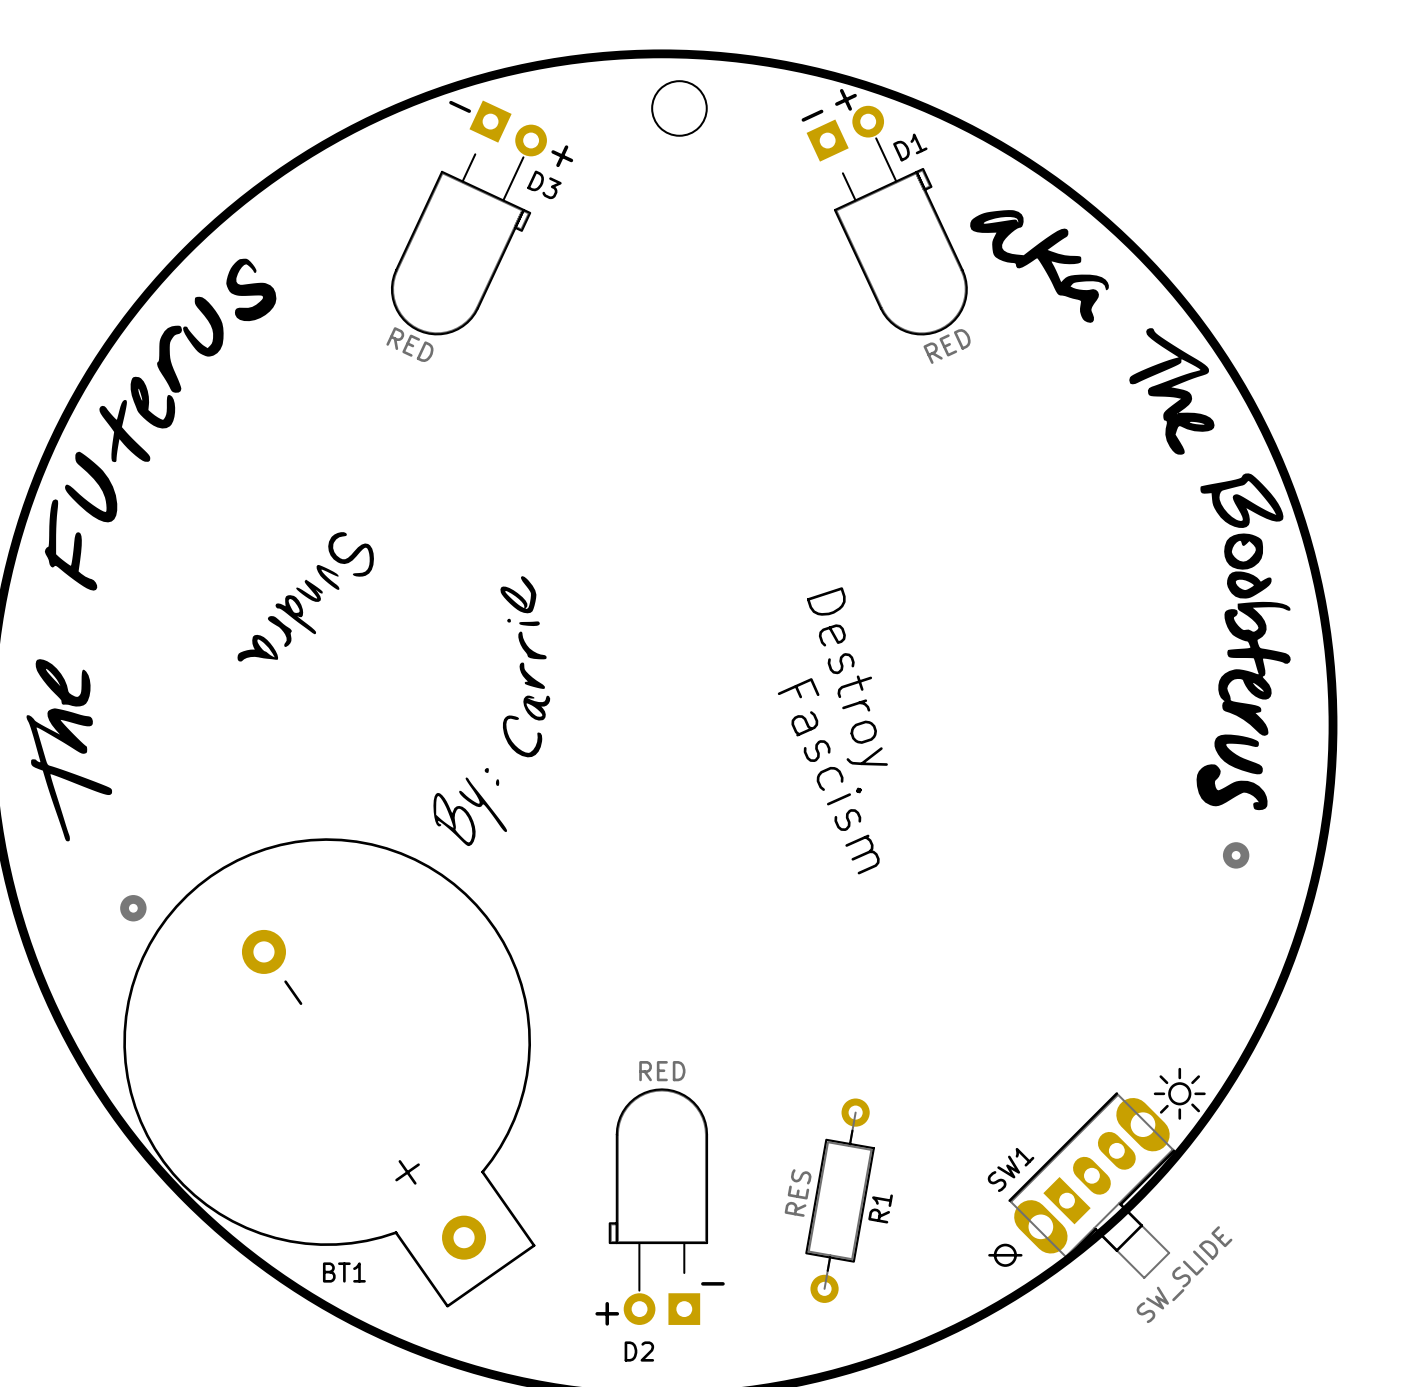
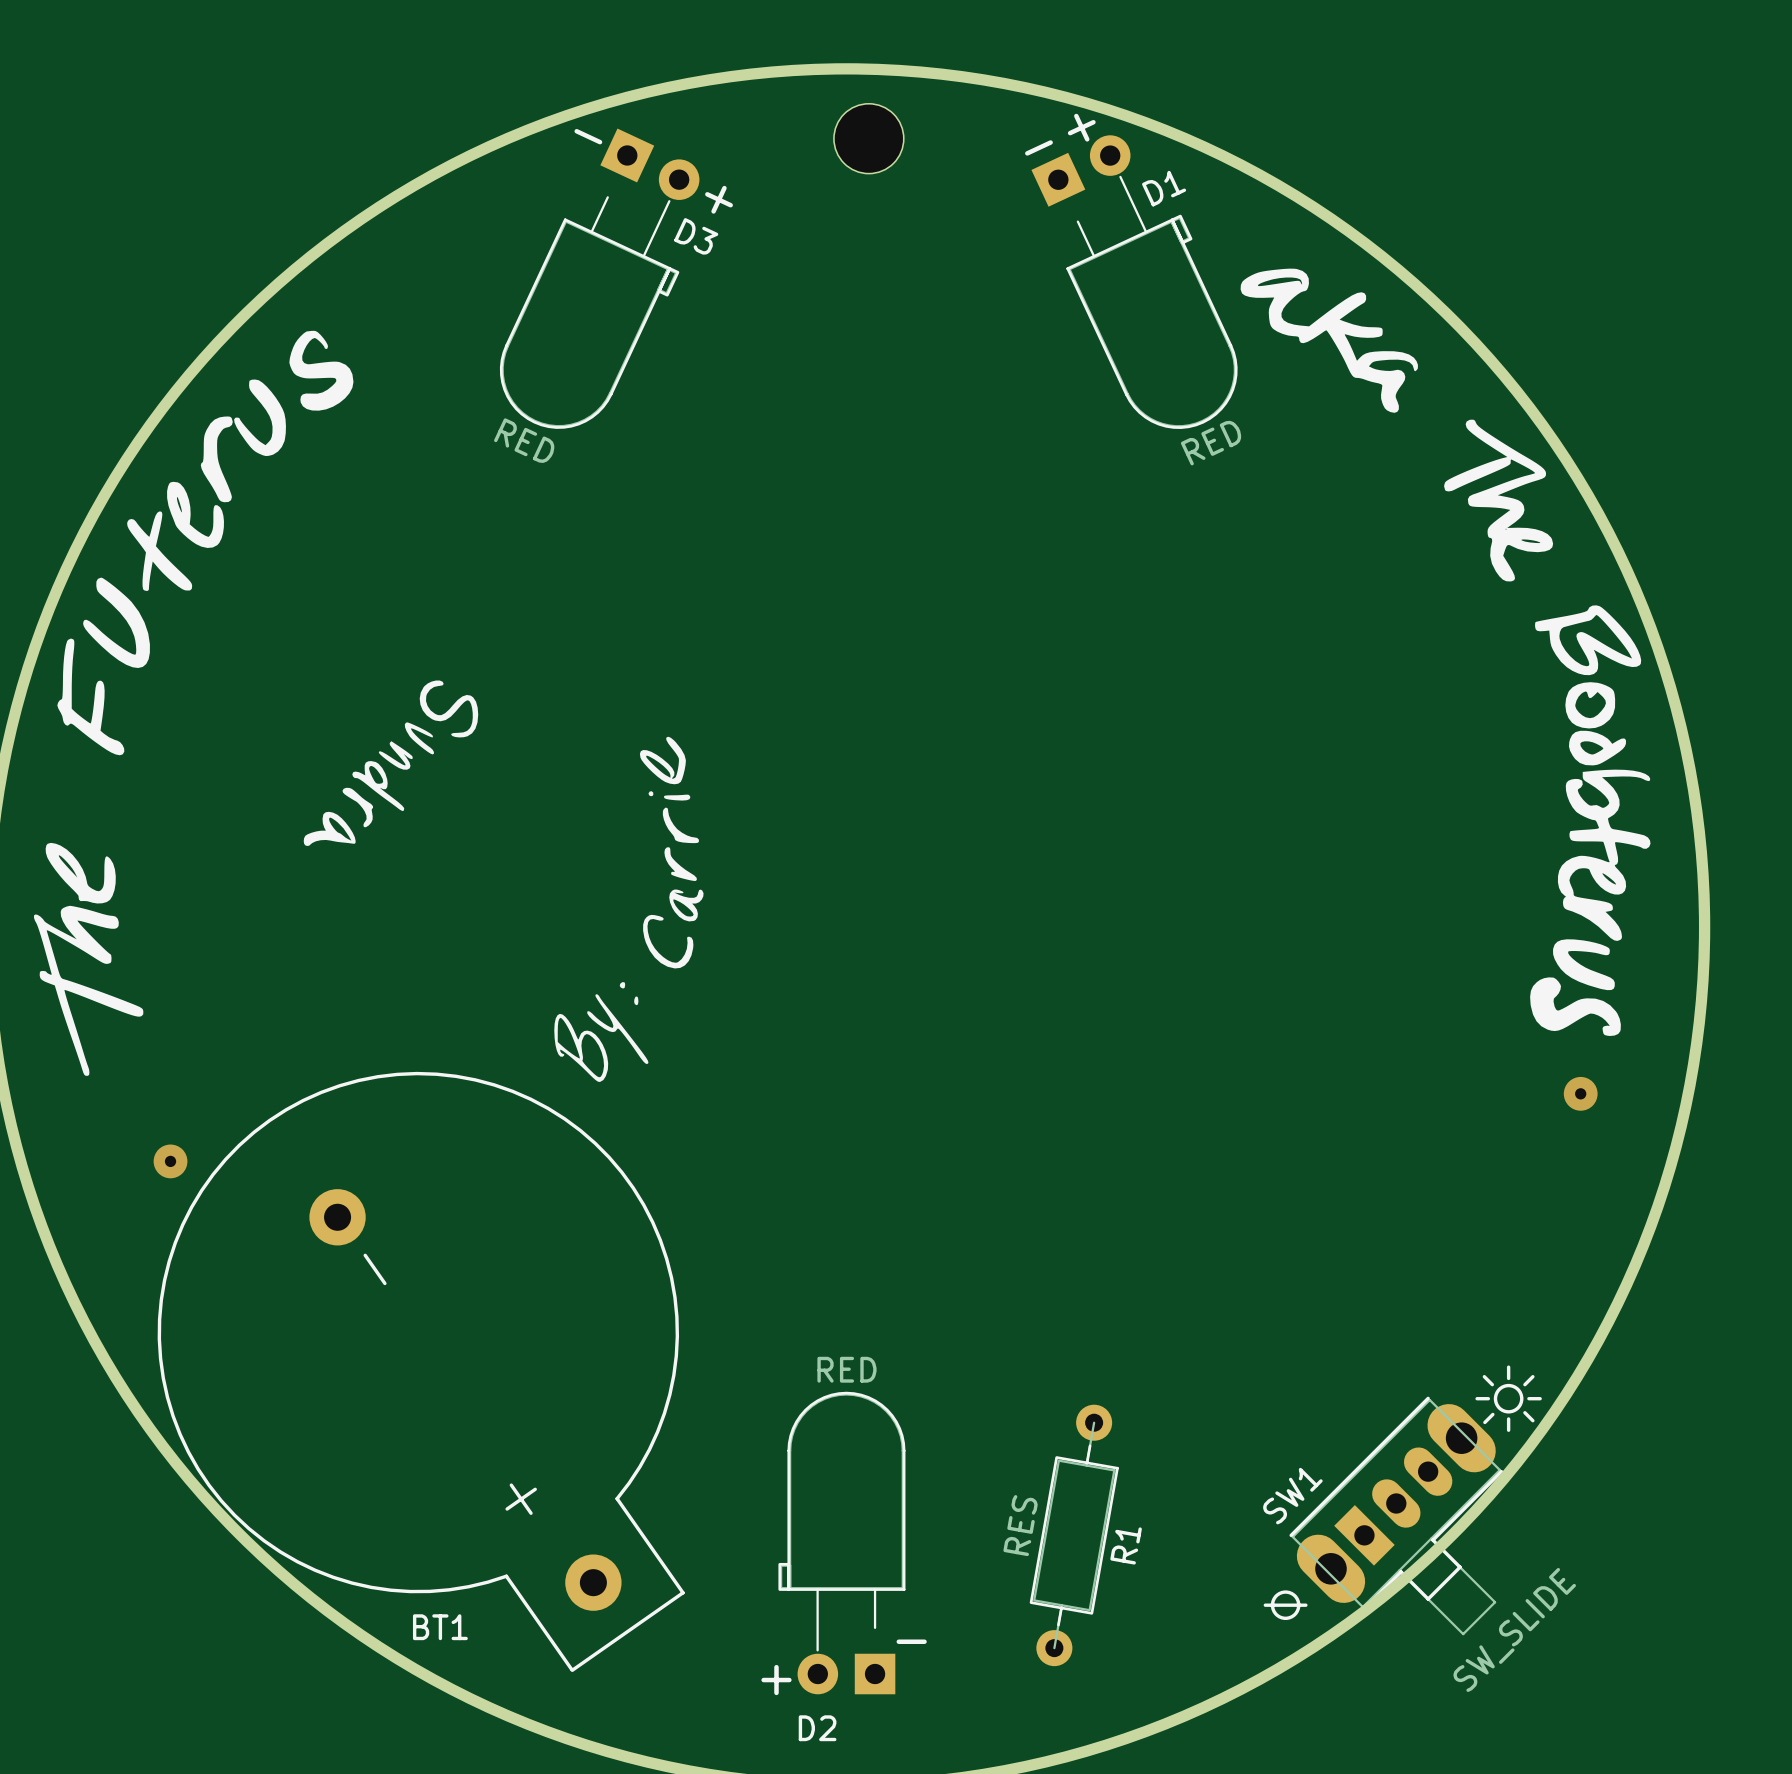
text: Destroy (847, 676) -> none
text: Fascism (828, 776) -> none

